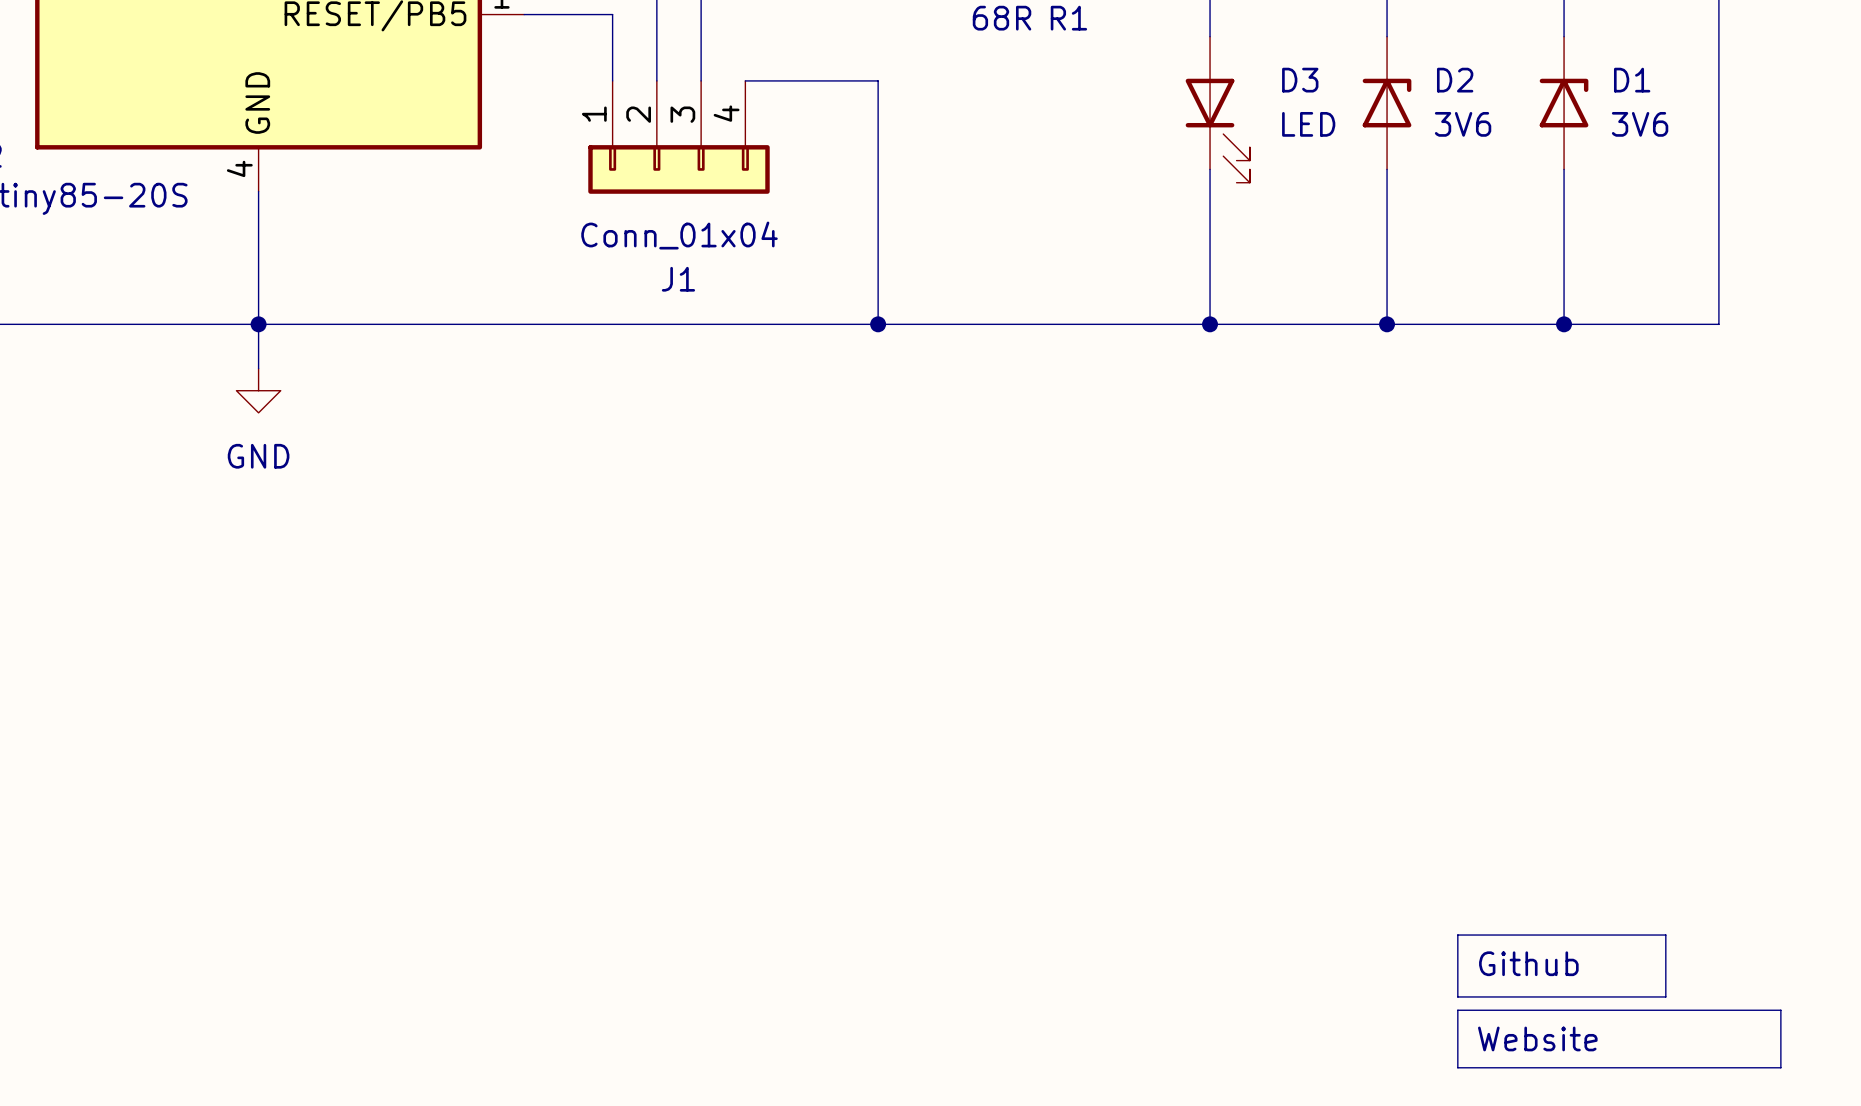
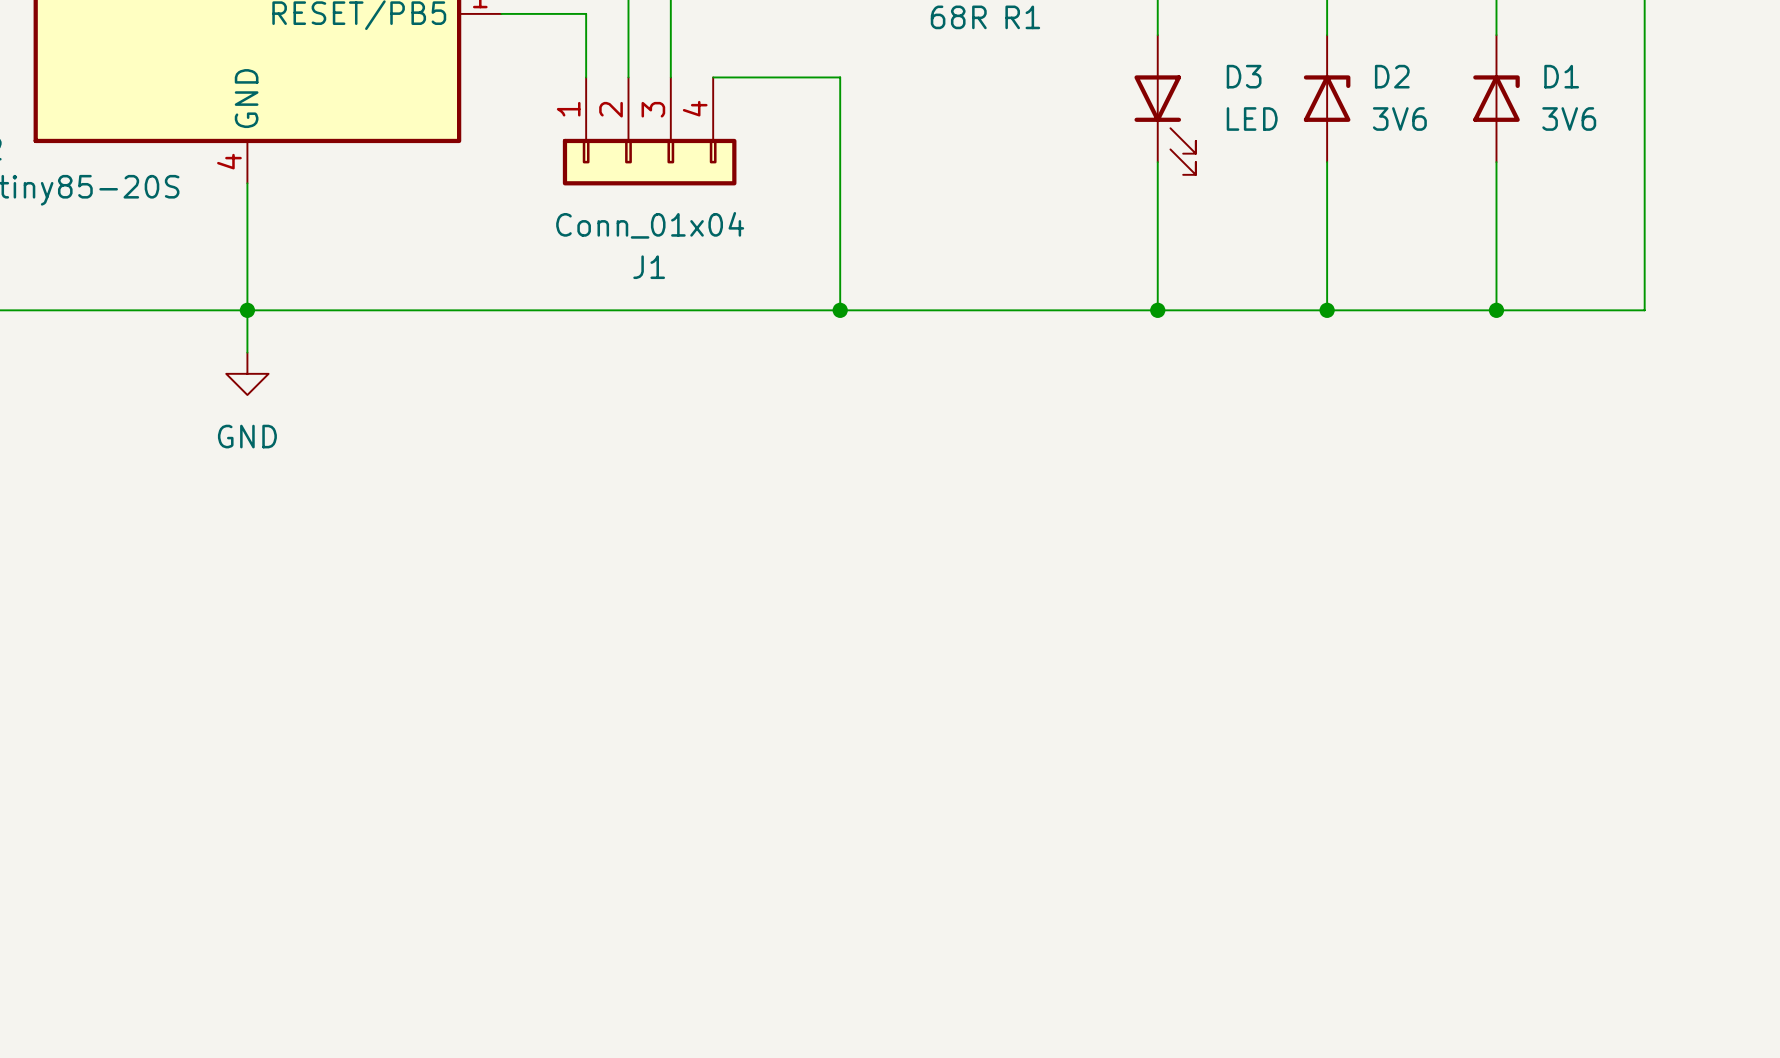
line: (1457, 935) (1457, 996) (1665, 996) (1665, 935) (1457, 935) -> none
text: Github (1528, 963) -> none
line: (1457, 1010) (1780, 1010) (1780, 1067) (1457, 1067) (1457, 1010) -> none
text: Website (1537, 1038) -> none

